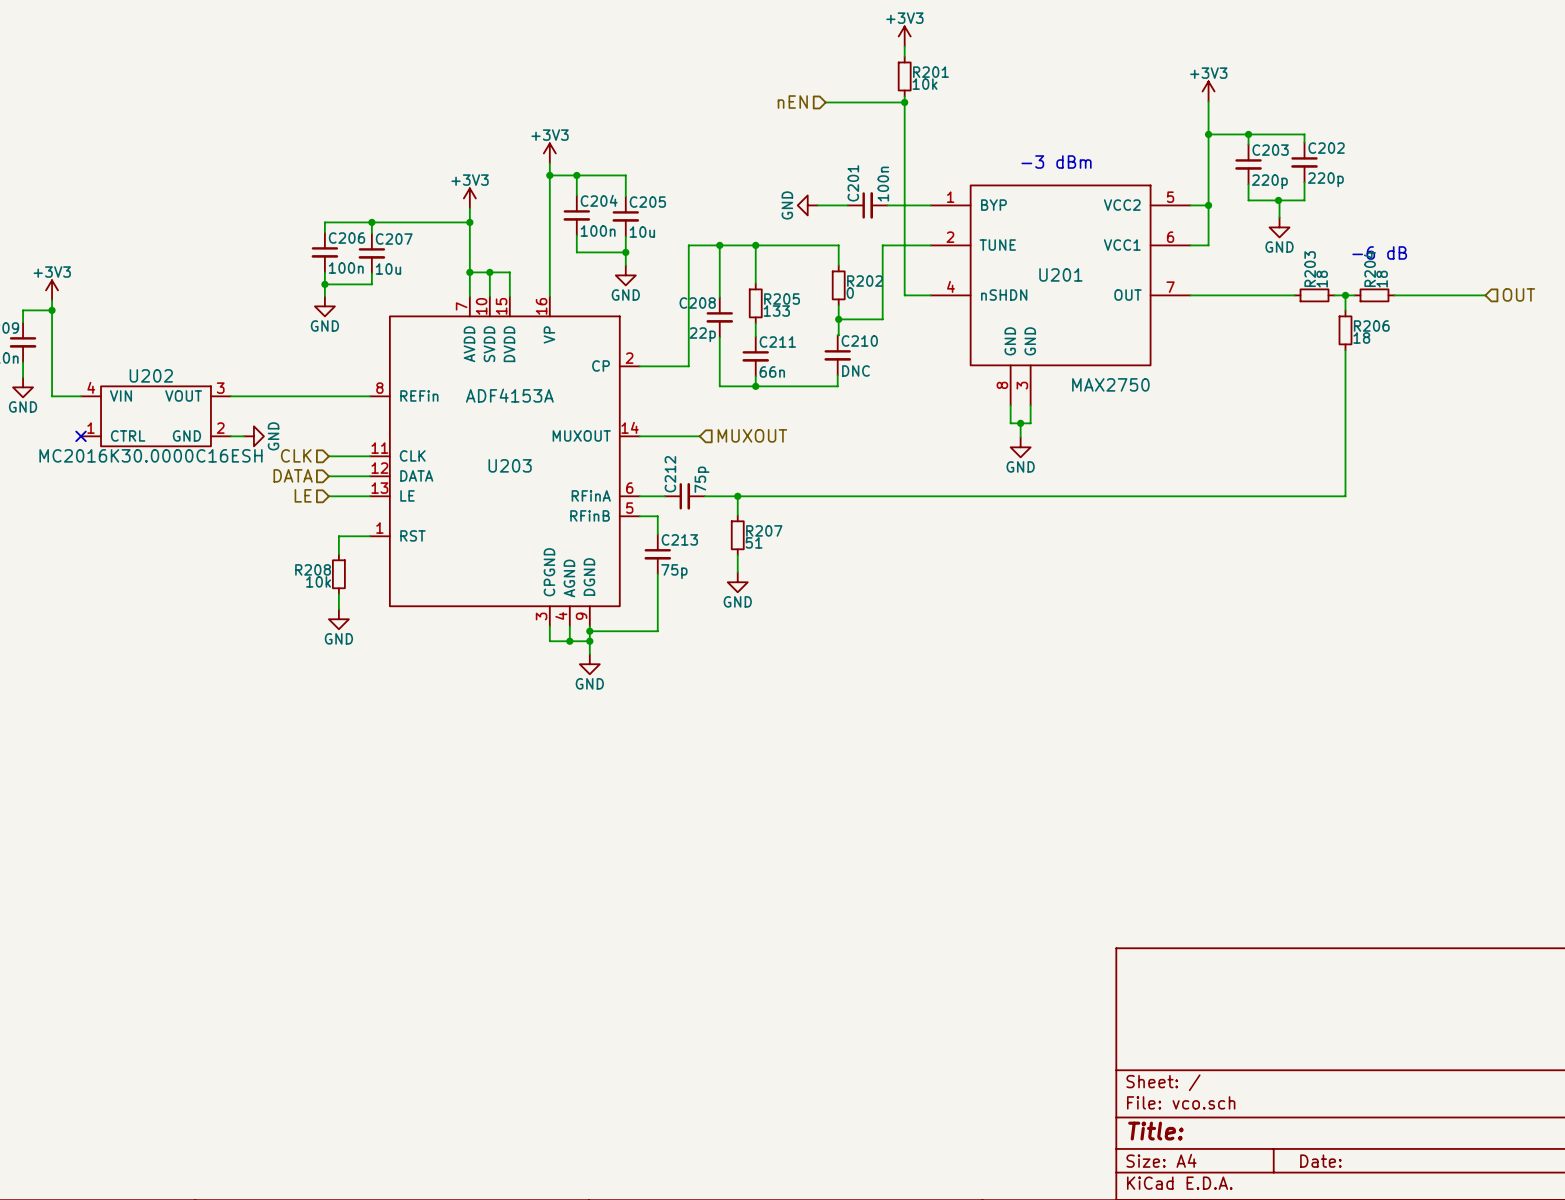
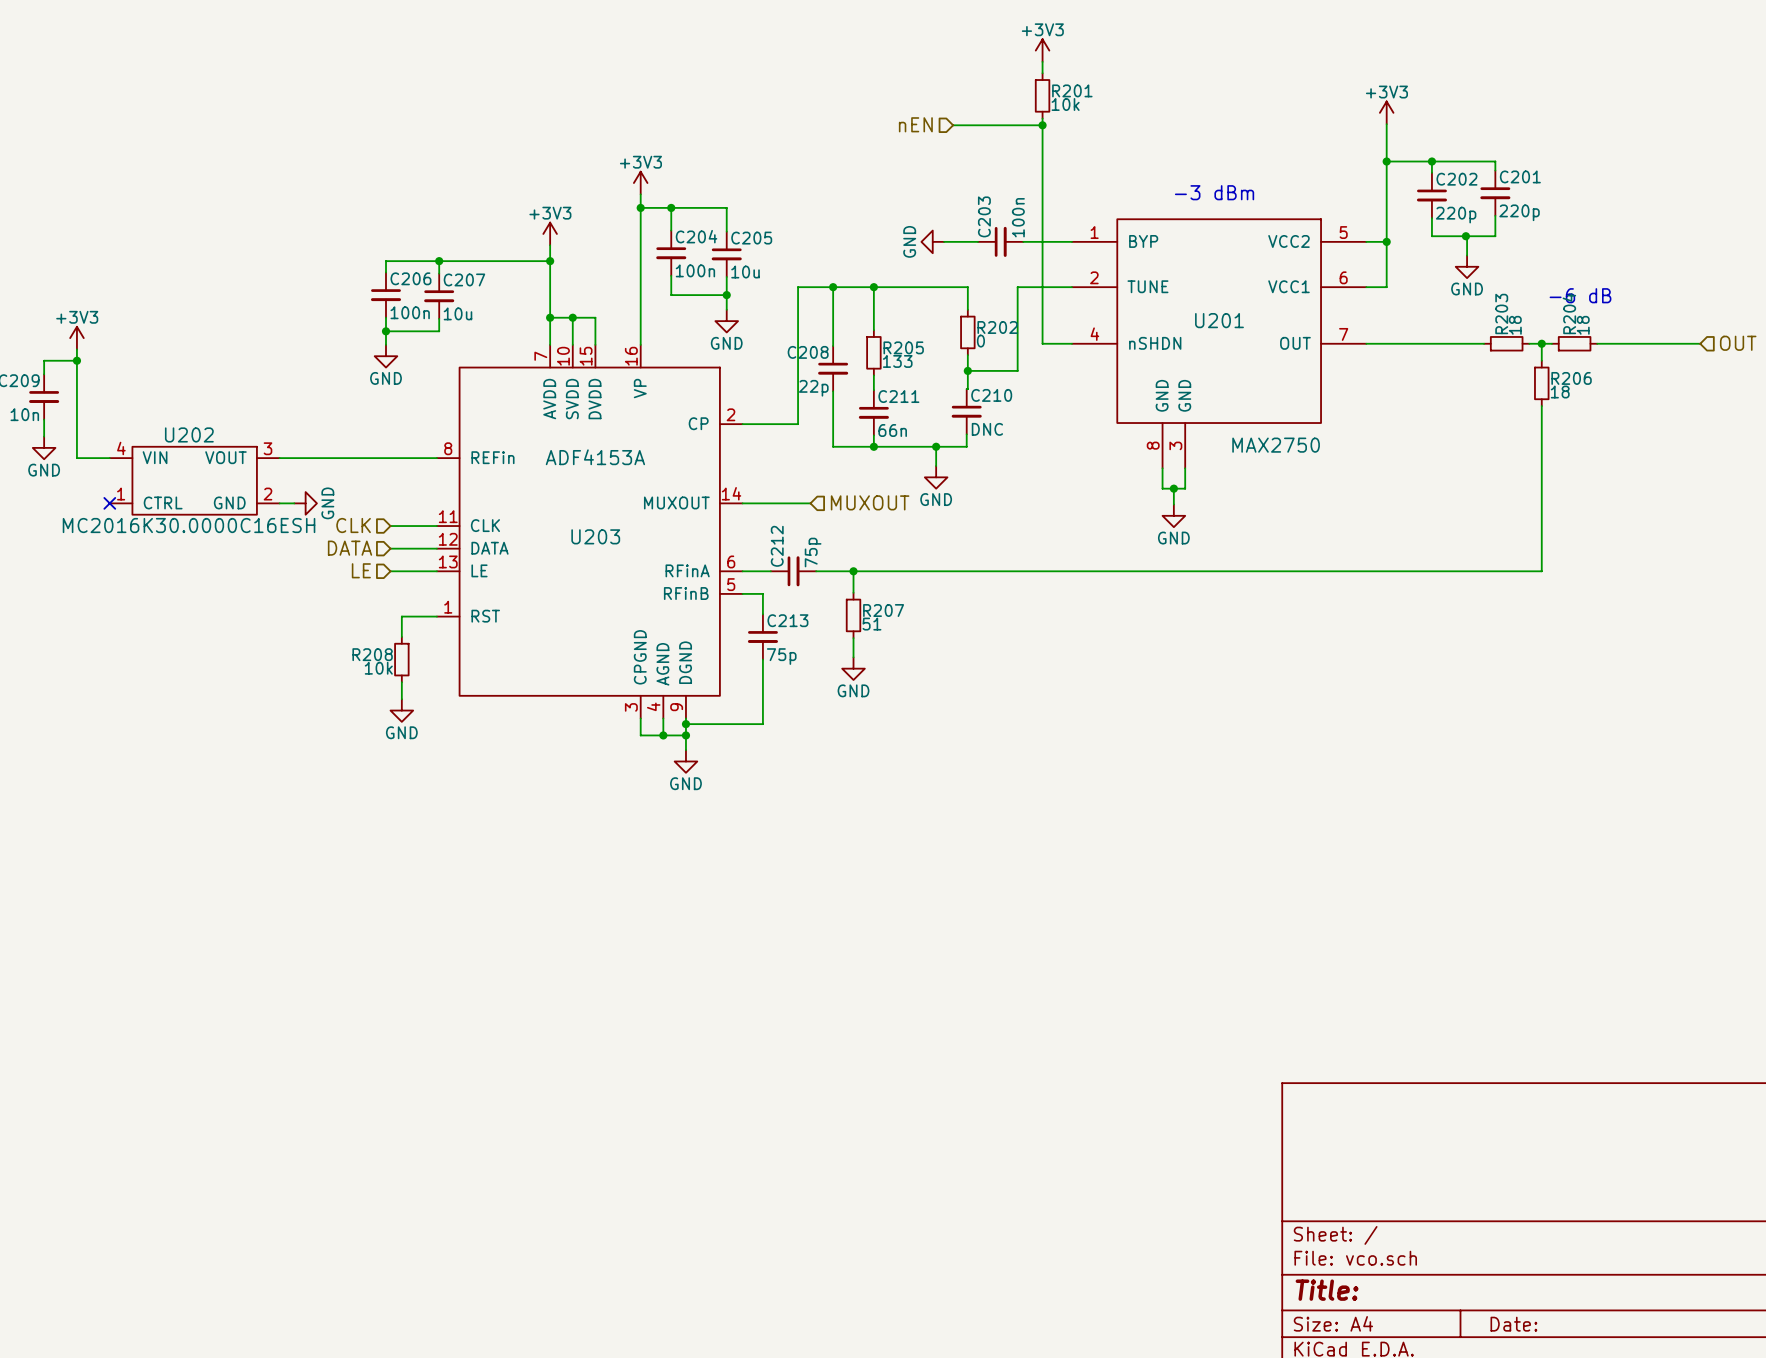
C202 name: C202 (1326, 148) -> C201 (1520, 176)
C203 name: C203 (1270, 150) -> C202 (1456, 179)
C201 name: C201 (853, 183) -> C203 (984, 216)
wire: none -> (936, 446) (936, 466)
junction: none -> (936, 446)
power symbol: none -> GND (936, 477)

